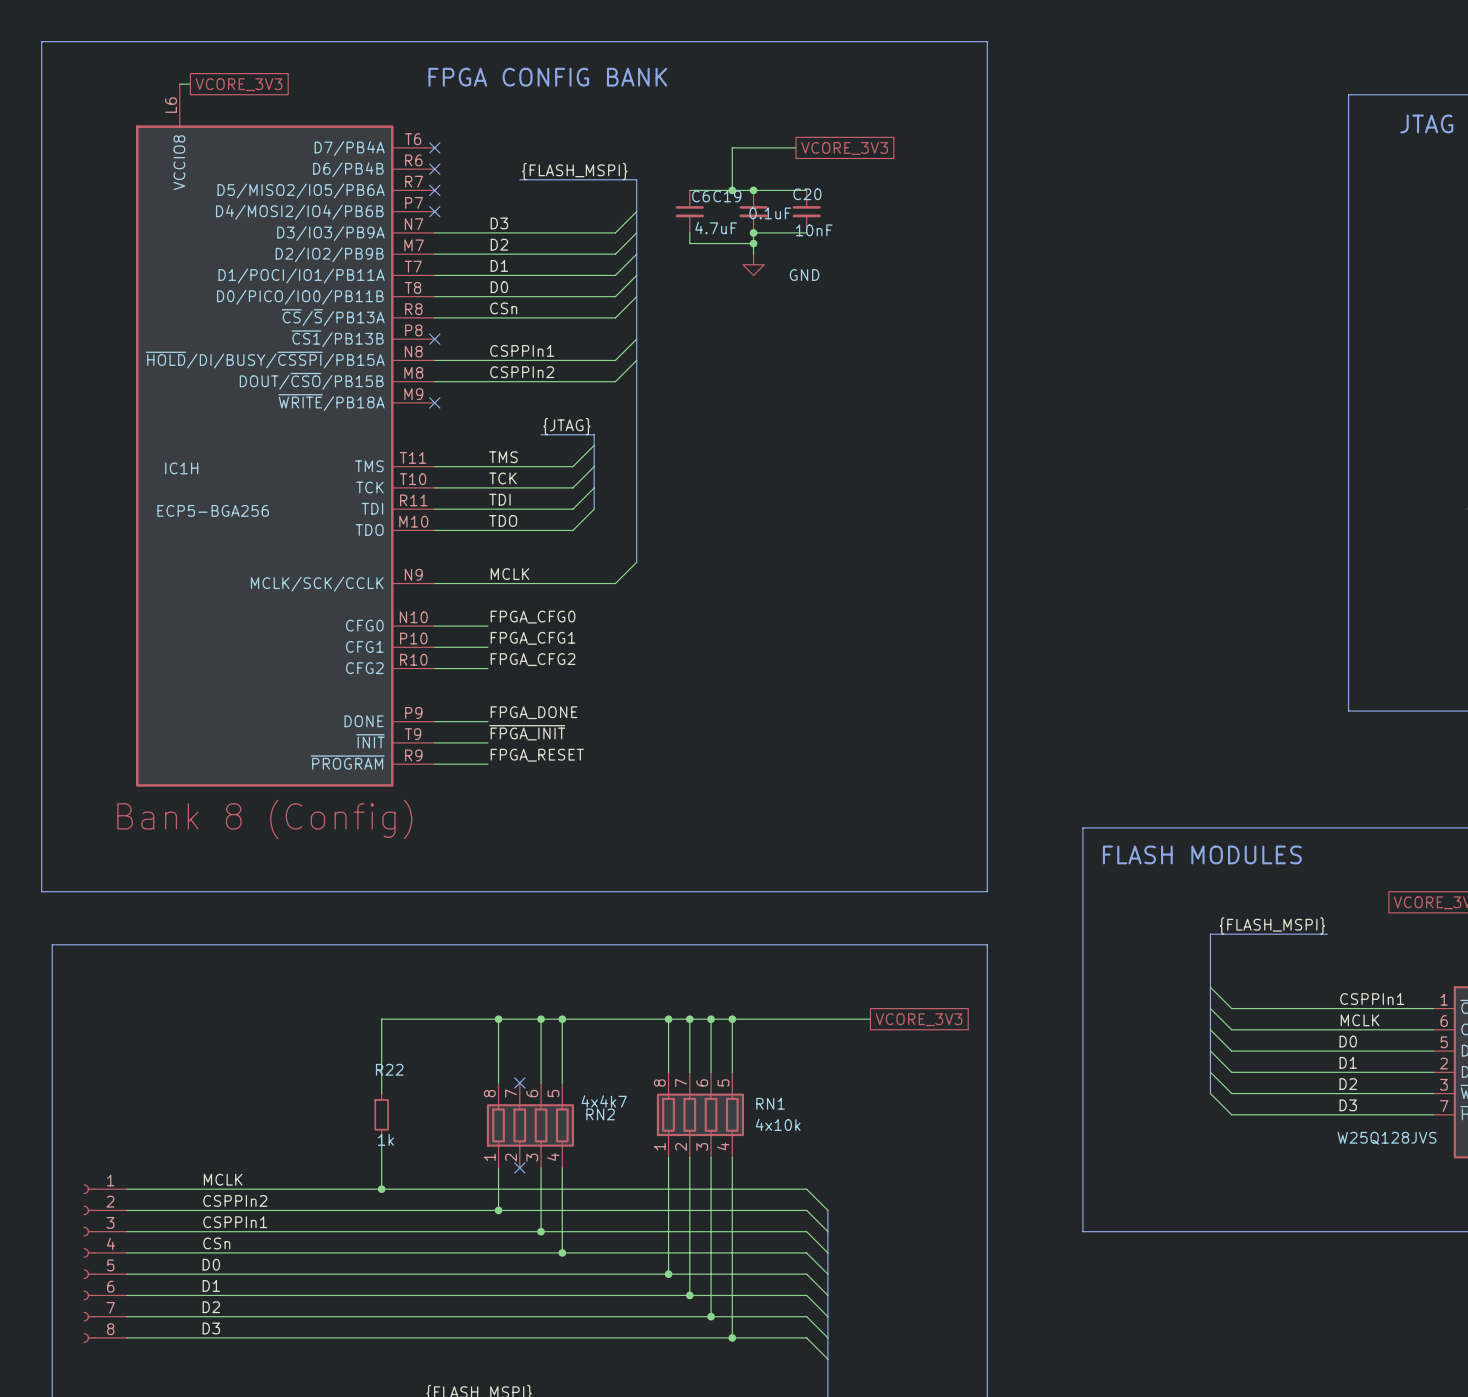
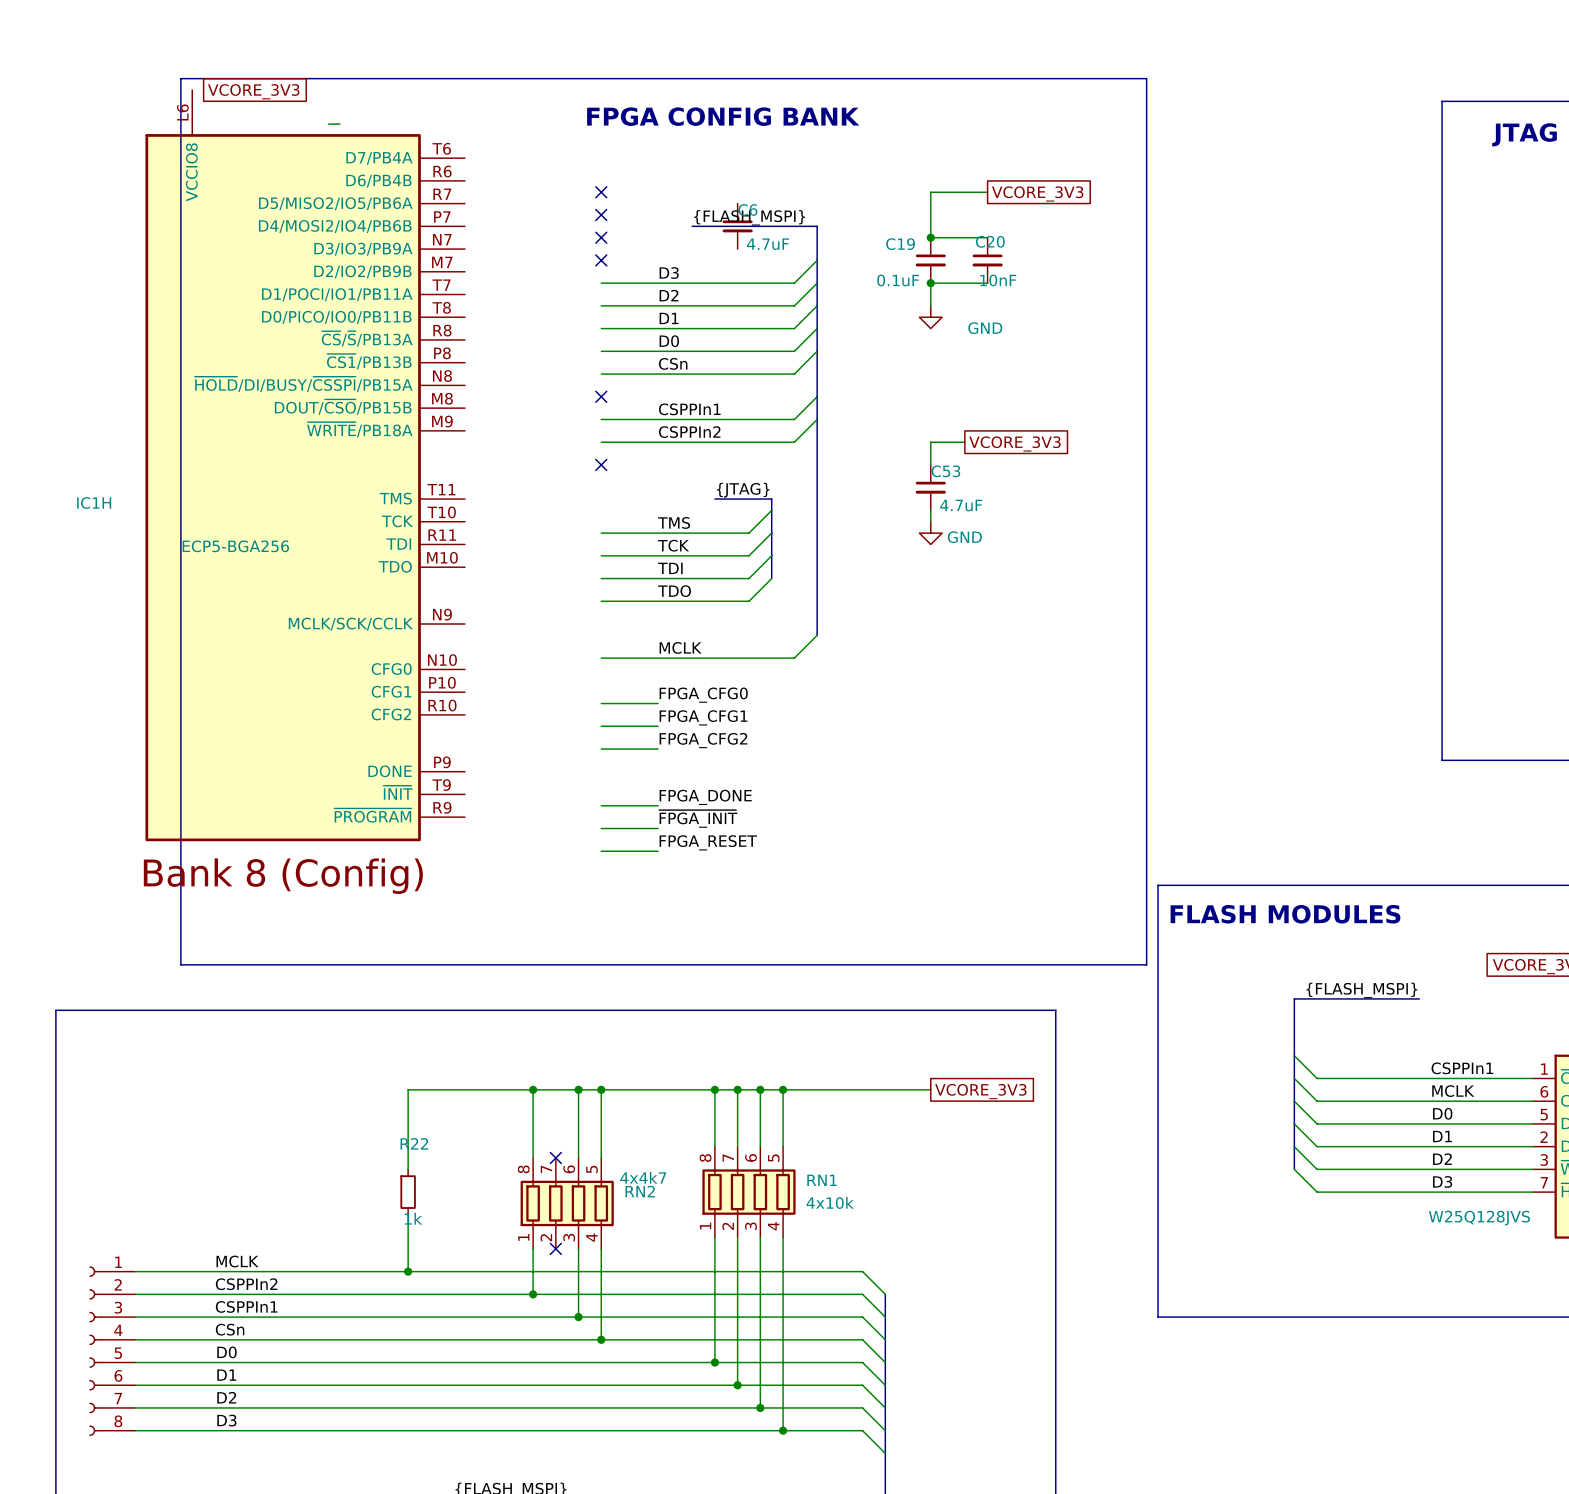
line: (41, 41) (987, 41) (987, 891) (41, 891) (41, 41) -> (180, 78) (180, 964) (1146, 964) (1146, 78) (180, 78)
text position: FPGA CONFIG BANK (547, 77) -> FPGA CONFIG BANK (723, 116)
wire: (179, 84) (190, 84) -> (328, 124) (339, 124)
no-connect mark: (434, 147) -> none
wire: (796, 147) (732, 147) (732, 190) -> none
global label position: VCORE_3V3 (844, 148) -> VCORE_3V3 (1037, 193)
no-connect mark: (434, 169) -> none
label position: {FLASH_MSPI} (574, 171) -> {FLASH_MSPI} (749, 217)
bus: (519, 179) (636, 179) (636, 562) -> (692, 226) (817, 226) (817, 635)
no-connect mark: none -> (601, 192)
wire: none -> (987, 192) (930, 192) (930, 237) (987, 237)
no-connect mark: (434, 190) -> none
wire: (689, 190) (806, 190) -> none
junction: (732, 190) -> none
junction: (753, 190) -> none
no-connect mark: none -> (601, 214)
no-connect mark: (434, 211) -> none
wire: (636, 211) (615, 232) (434, 232) -> (817, 260) (794, 283) (601, 283)
C19 position: (753, 211) -> (930, 260)
C20 position: (806, 211) -> (987, 260)
C19 value position: 0.1uF (770, 213) -> 0.1uF (898, 280)
no-connect mark: none -> (601, 237)
junction: none -> (930, 237)
label position: D3 (499, 223) -> D3 (669, 273)
wire: (636, 232) (615, 254) (434, 254) -> (817, 283) (794, 305) (601, 305)
wire: (689, 232) (689, 243) (753, 243) -> none
junction: (753, 232) -> none
wire: (806, 232) (753, 232) (753, 254) -> (987, 283) (930, 283) (930, 305)
no-connect mark: none -> (601, 260)
junction: (753, 243) -> none
label position: D2 (499, 244) -> D2 (669, 295)
wire: (636, 254) (615, 275) (434, 275) -> (817, 305) (794, 328) (601, 328)
power symbol position: GND (753, 264) -> GND (930, 317)
junction: none -> (930, 283)
label position: D1 (499, 265) -> D1 (669, 318)
wire: (636, 275) (615, 296) (434, 296) -> (817, 328) (794, 351) (601, 351)
label position: D0 (499, 287) -> D0 (669, 341)
wire: (636, 296) (615, 317) (434, 317) -> (817, 351) (794, 374) (601, 374)
label position: CSn (503, 308) -> CSn (673, 363)
no-connect mark: (434, 339) -> none
wire: (636, 339) (615, 360) (434, 360) -> (817, 396) (794, 419) (601, 419)
label position: CSPPIn1 (522, 350) -> CSPPIn1 (689, 409)
wire: (636, 360) (615, 381) (434, 381) -> (817, 419) (794, 442) (601, 442)
no-connect mark: none -> (601, 396)
label position: CSPPIn2 (522, 372) -> CSPPIn2 (689, 432)
no-connect mark: (434, 402) -> none
wire: none -> (964, 442) (930, 442) (930, 464)
global label: none -> VCORE_3V3 (1014, 443)
label position: {JTAG} (566, 426) -> {JTAG} (743, 490)
bus: (541, 434) (594, 434) (594, 509) -> (714, 499) (771, 499) (771, 578)
no-connect mark: none -> (601, 464)
wire: (594, 445) (572, 466) (434, 466) -> (771, 510) (748, 533) (601, 533)
C53: none -> 4.7uF (930, 487)
label position: TMS (503, 457) -> TMS (674, 522)
wire: (594, 466) (572, 487) (434, 487) -> (771, 533) (748, 555) (601, 555)
IC1H name position: IC1H (181, 468) -> IC1H (94, 503)
wire: none -> (930, 510) (930, 521)
label position: TCK (502, 478) -> TCK (673, 545)
wire: (594, 487) (572, 509) (434, 509) -> (771, 555) (748, 578) (601, 578)
power symbol: none -> GND (930, 533)
label position: TDI (499, 499) -> TDI (670, 568)
wire: (594, 509) (572, 530) (434, 530) -> (771, 578) (748, 601) (601, 601)
label position: TDO (503, 520) -> TDO (674, 591)
wire: (636, 562) (615, 583) (434, 583) -> (817, 635) (794, 658) (601, 658)
label position: MCLK (510, 574) -> MCLK (680, 647)
label position: FPGA_CFG0 (533, 617) -> FPGA_CFG0 (703, 695)
wire: (434, 626) (487, 626) -> (601, 703) (658, 703)
label position: FPGA_CFG1 (533, 638) -> FPGA_CFG1 (703, 717)
wire: (434, 647) (487, 647) -> (601, 726) (658, 726)
label position: FPGA_CFG2 (533, 659) -> FPGA_CFG2 (703, 740)
wire: (434, 668) (487, 668) -> (601, 748) (658, 748)
label position: FPGA_DONE (534, 712) -> FPGA_DONE (705, 797)
wire: (434, 721) (487, 721) -> (601, 805) (658, 805)
label position: ~{FPGA_INIT} (527, 732) -> ~{FPGA_INIT} (698, 818)
wire: (434, 742) (487, 742) -> (601, 828) (658, 828)
label position: FPGA_RESET (537, 755) -> FPGA_RESET (708, 842)
wire: (434, 764) (487, 764) -> (601, 851) (658, 851)

